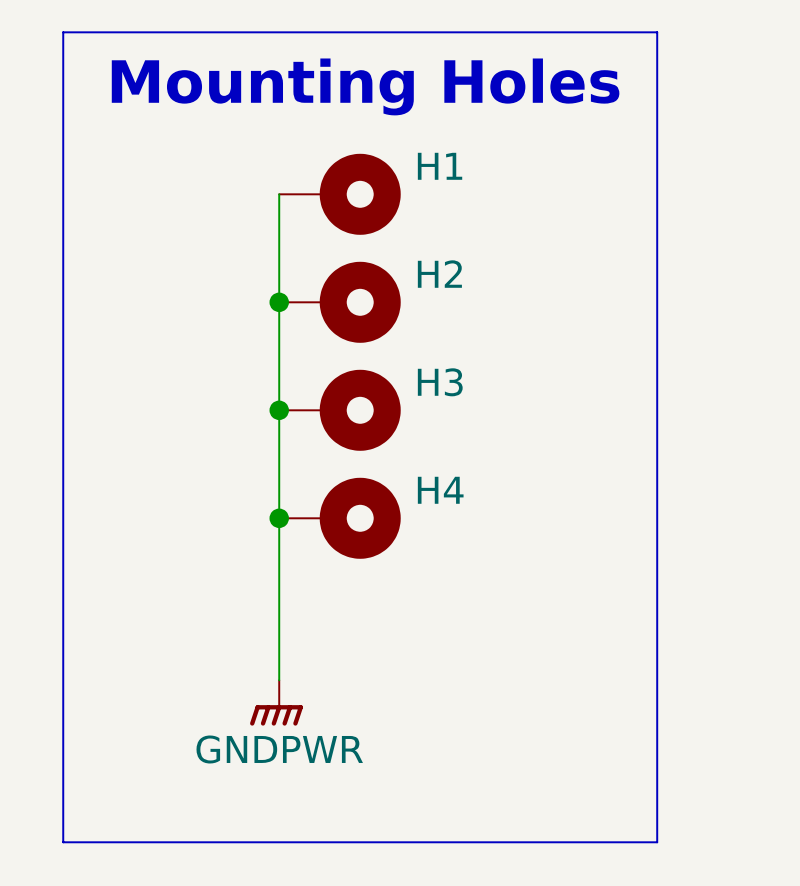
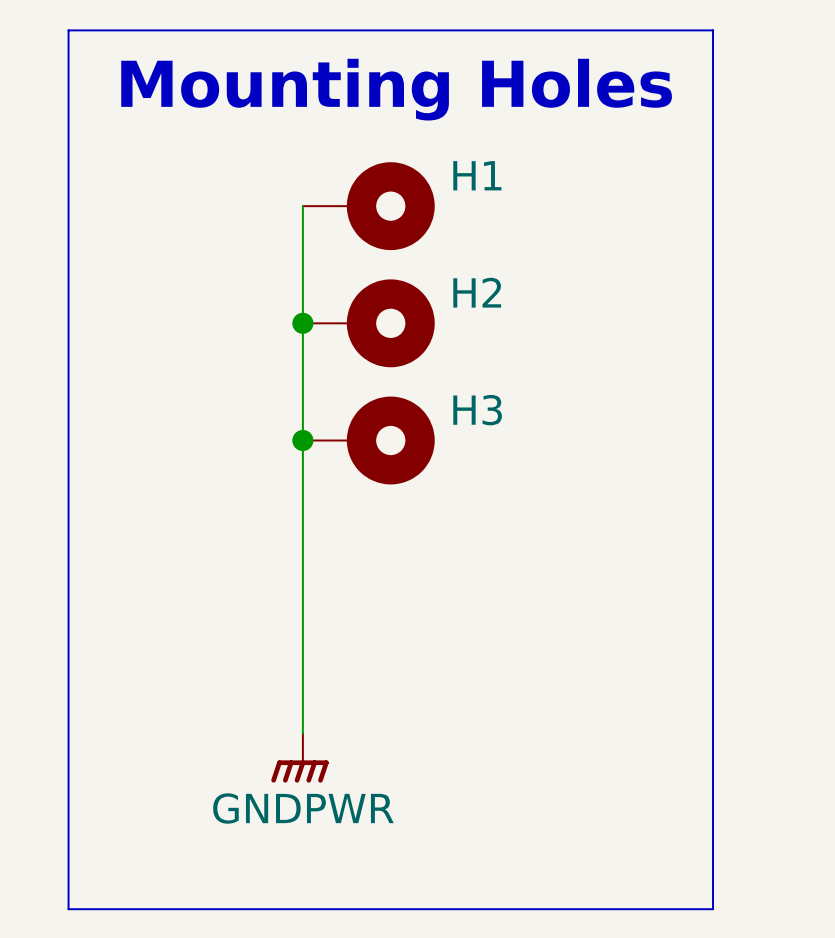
junction: (279, 518) -> none
H4: (339, 518) -> none

